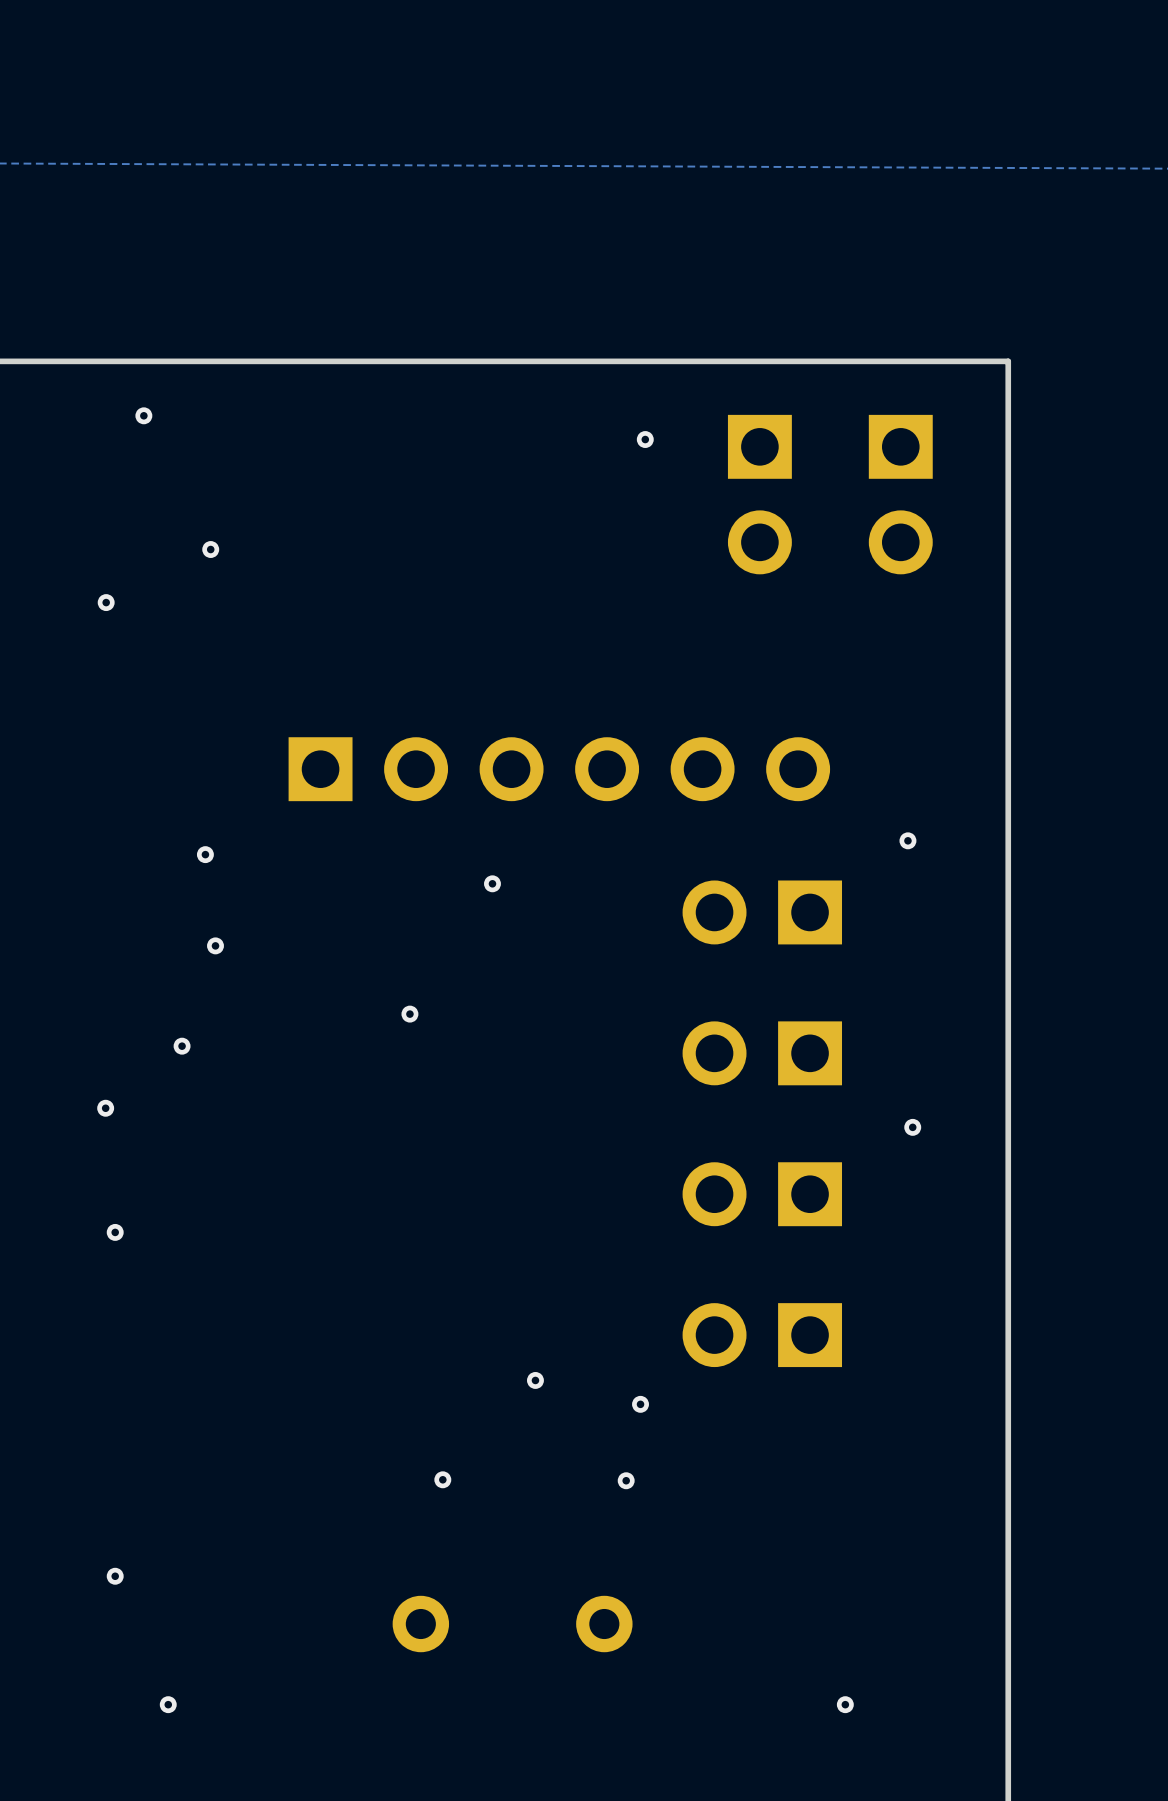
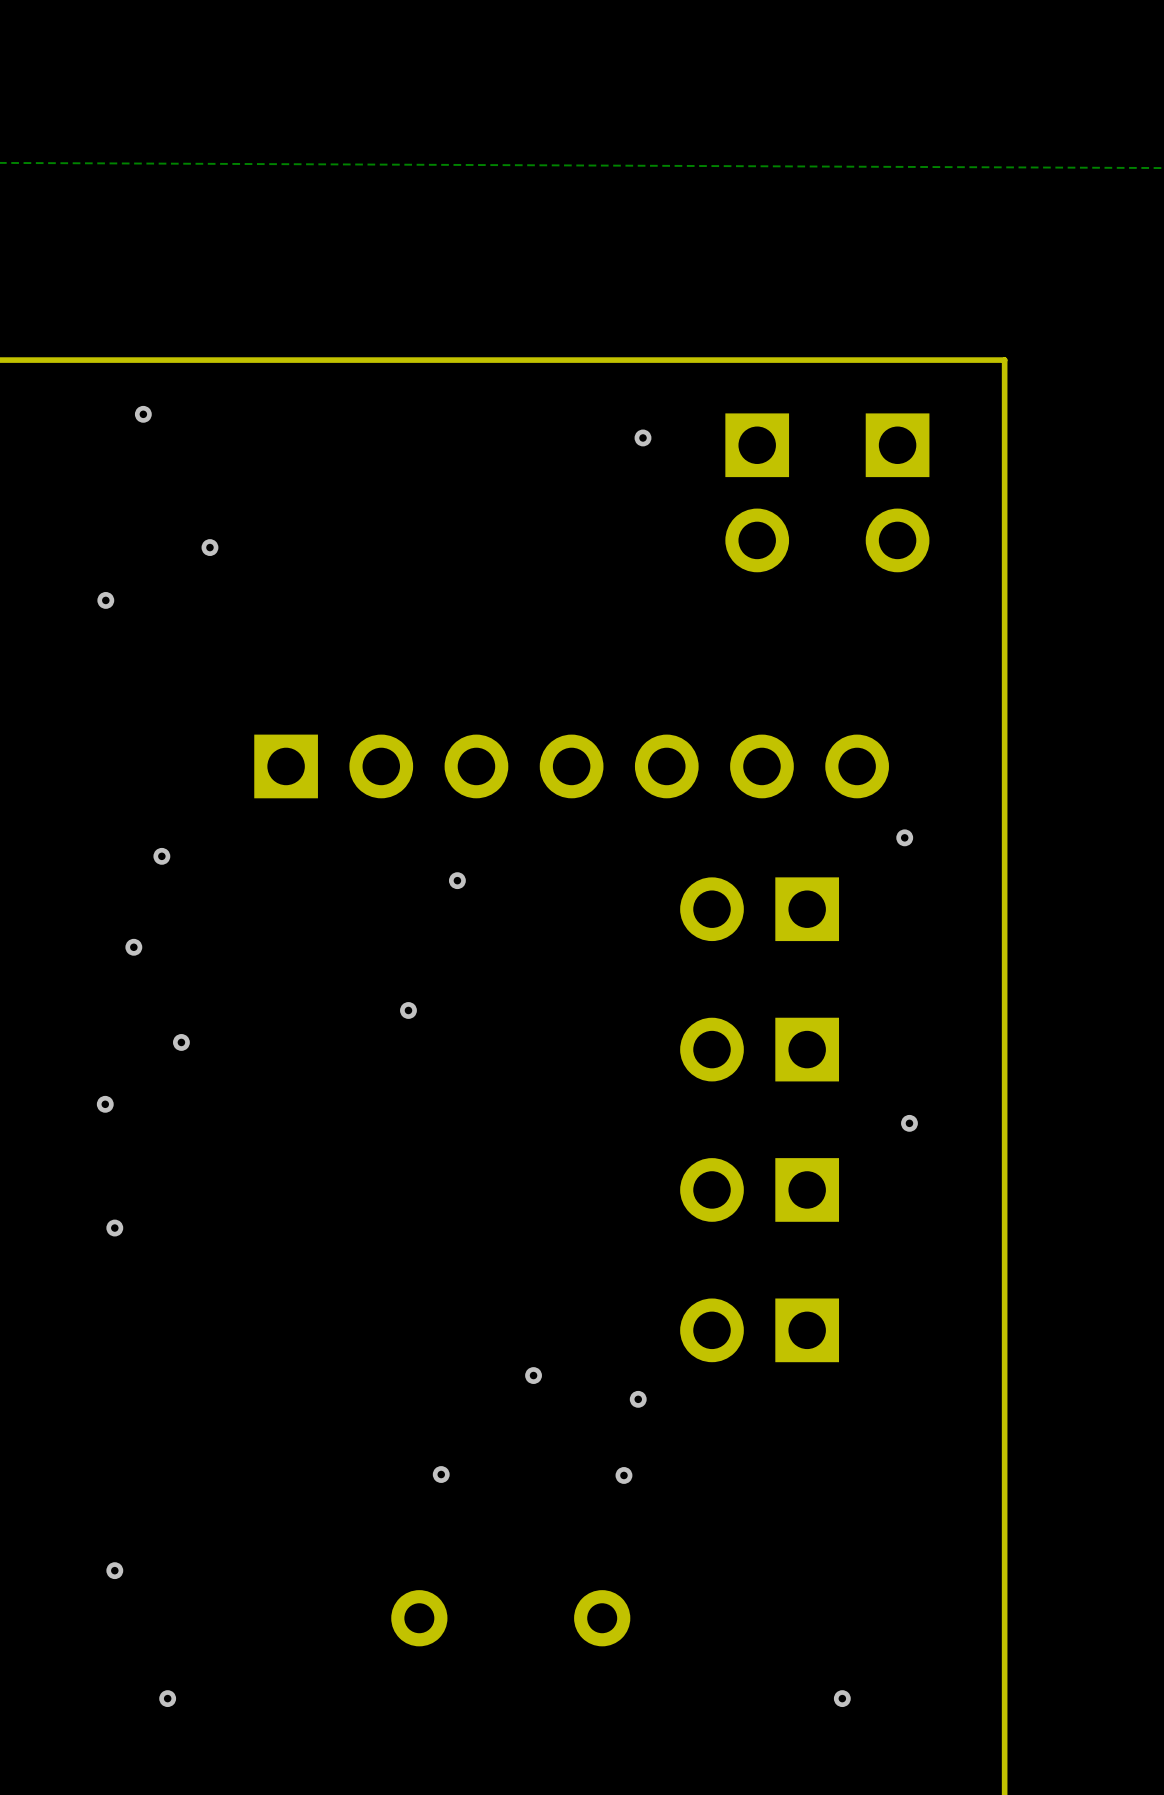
part footprint: [288, 737, 831, 802] -> [254, 734, 889, 799]
via position: (205, 854) -> (161, 856)
via position: (492, 883) -> (457, 880)
via: (215, 945) -> none
via: none -> (133, 947)

